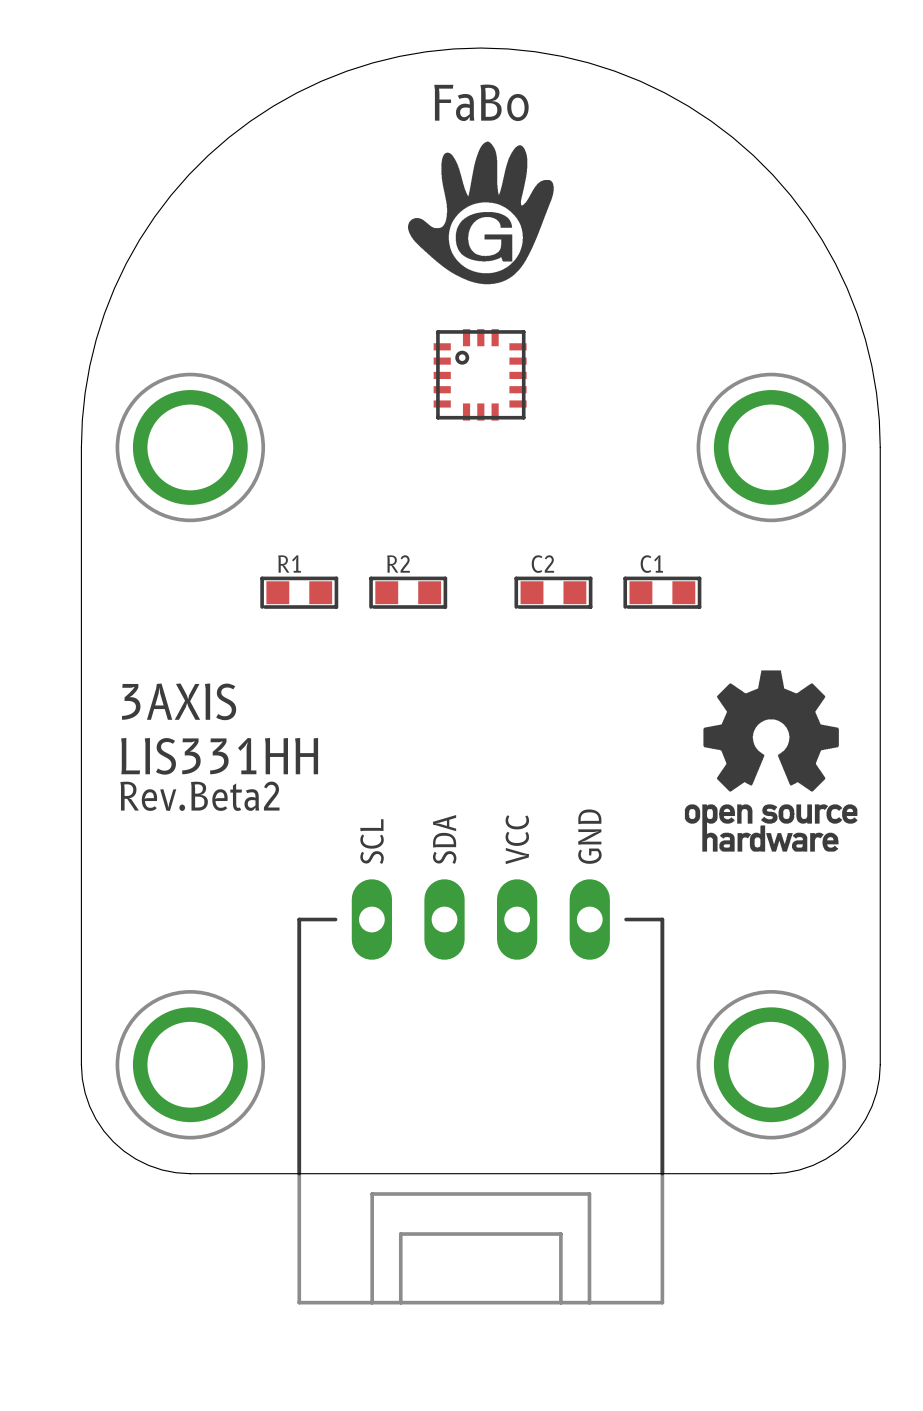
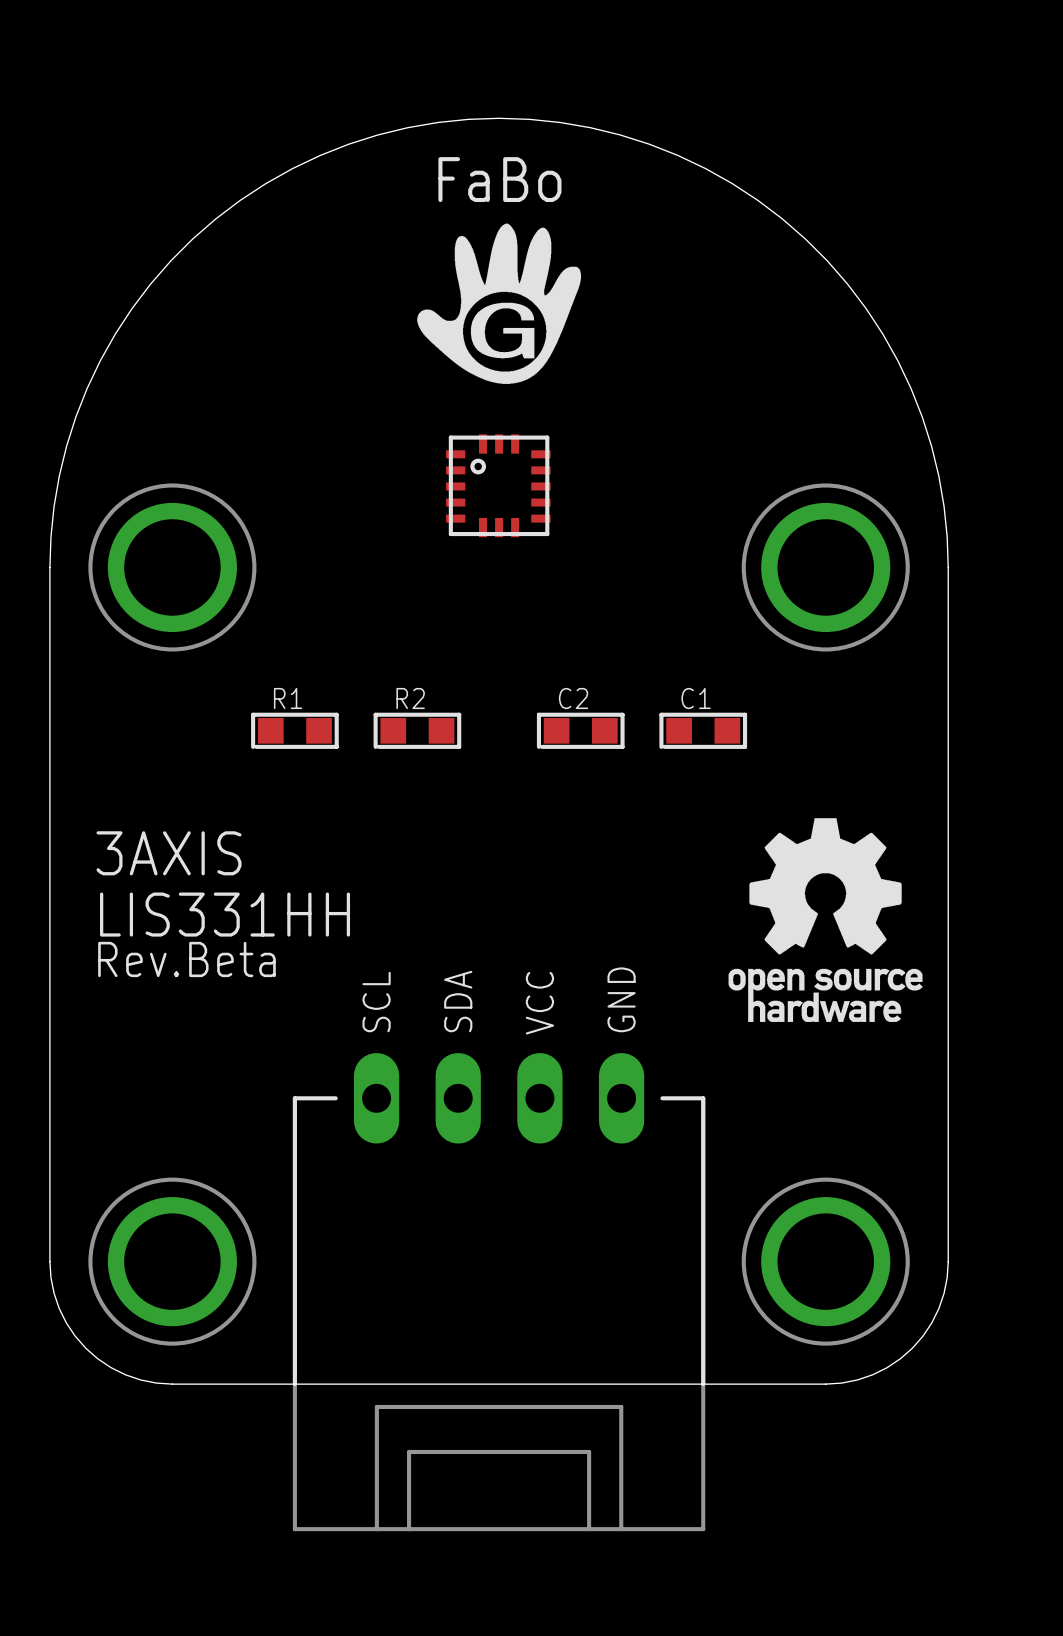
text: Rev.Beta2 (199, 796) -> Rev.Beta (186, 959)

